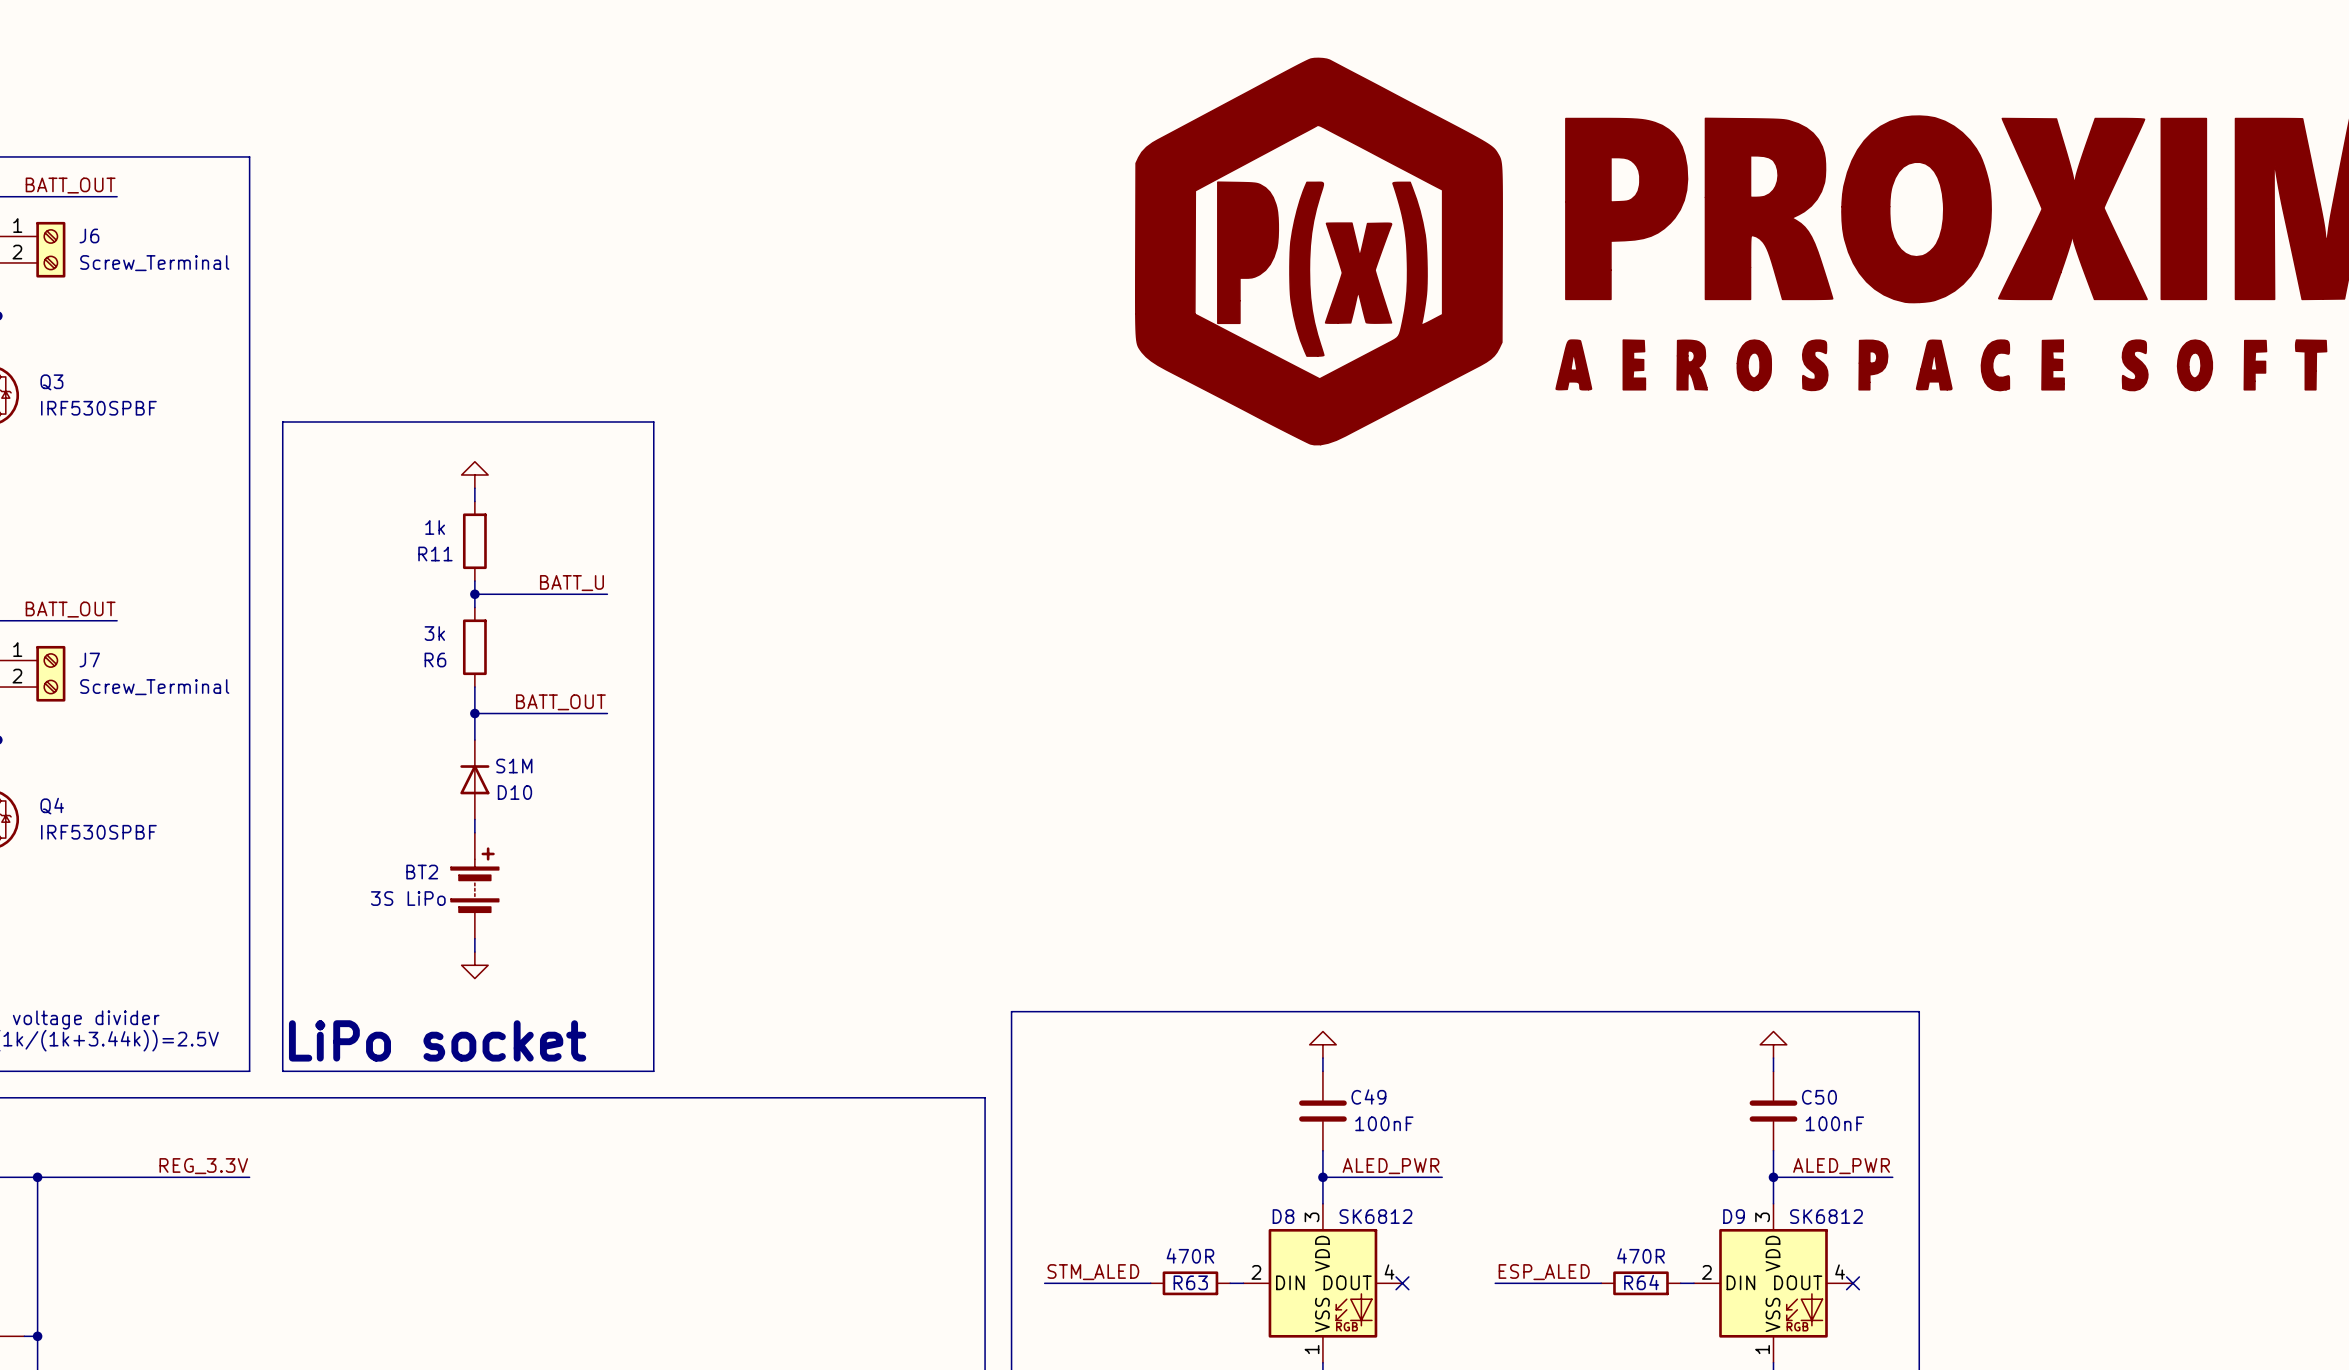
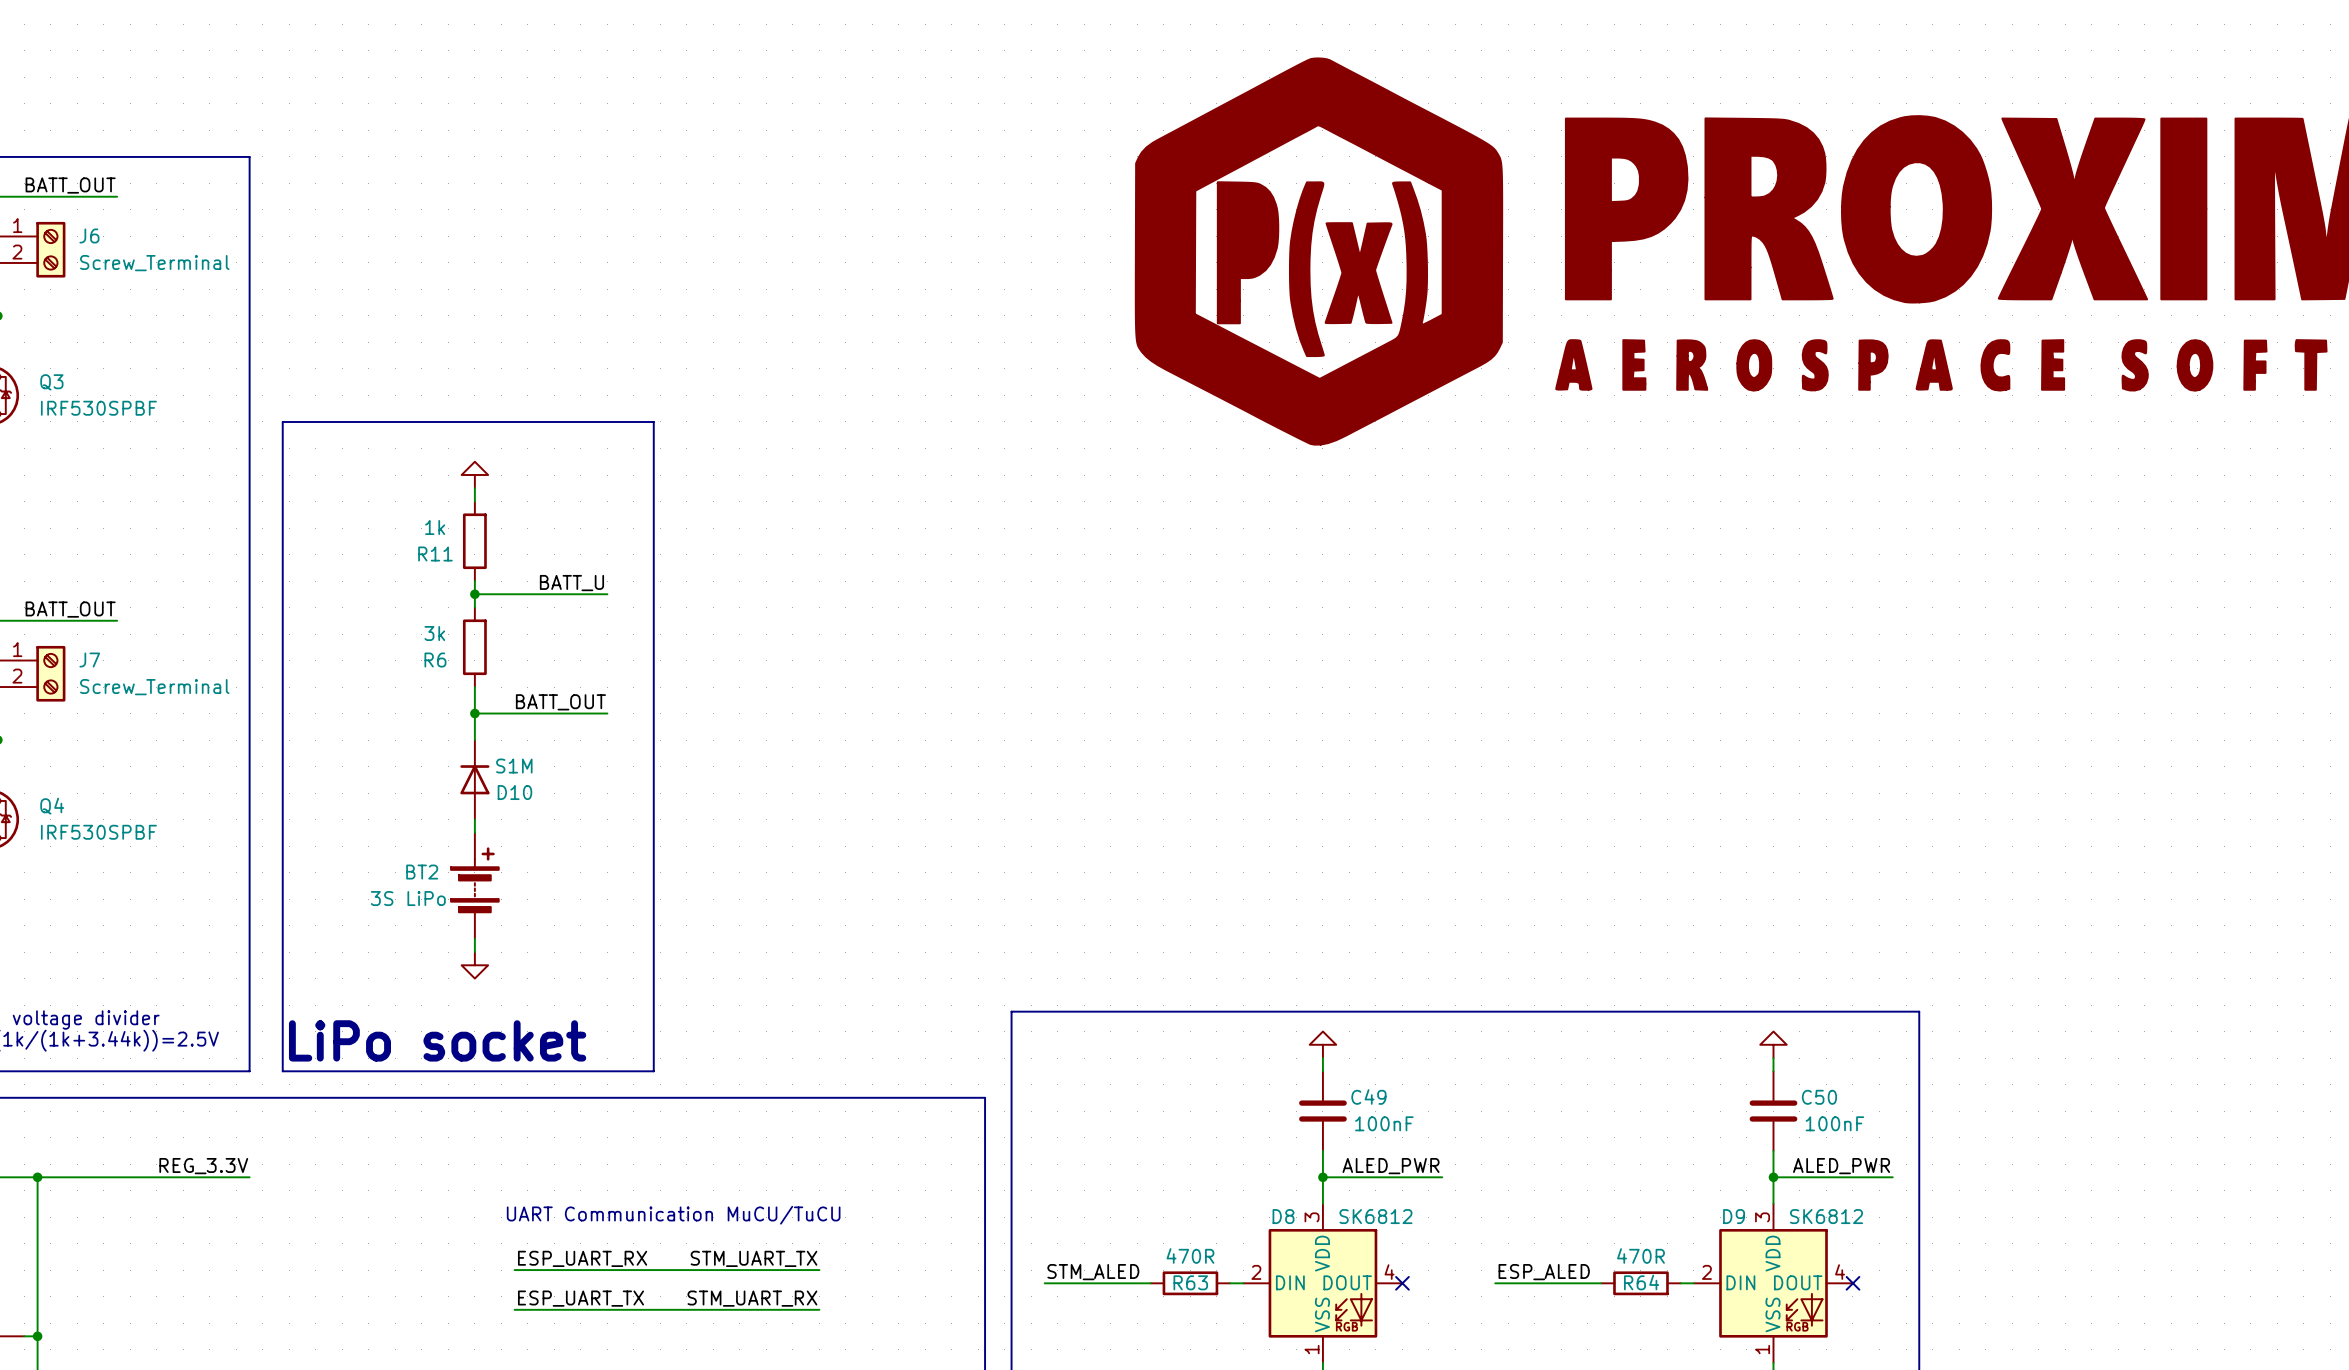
text: none -> UART Communication MuCU/TuCU (673, 1215)
label: none -> ESP_UART_RX (582, 1258)
label: none -> STM_UART_TX (754, 1258)
wire: none -> (514, 1270) (819, 1270)
label: none -> ESP_UART_TX (580, 1298)
label: none -> STM_UART_RX (752, 1298)
wire: none -> (514, 1309) (819, 1309)

